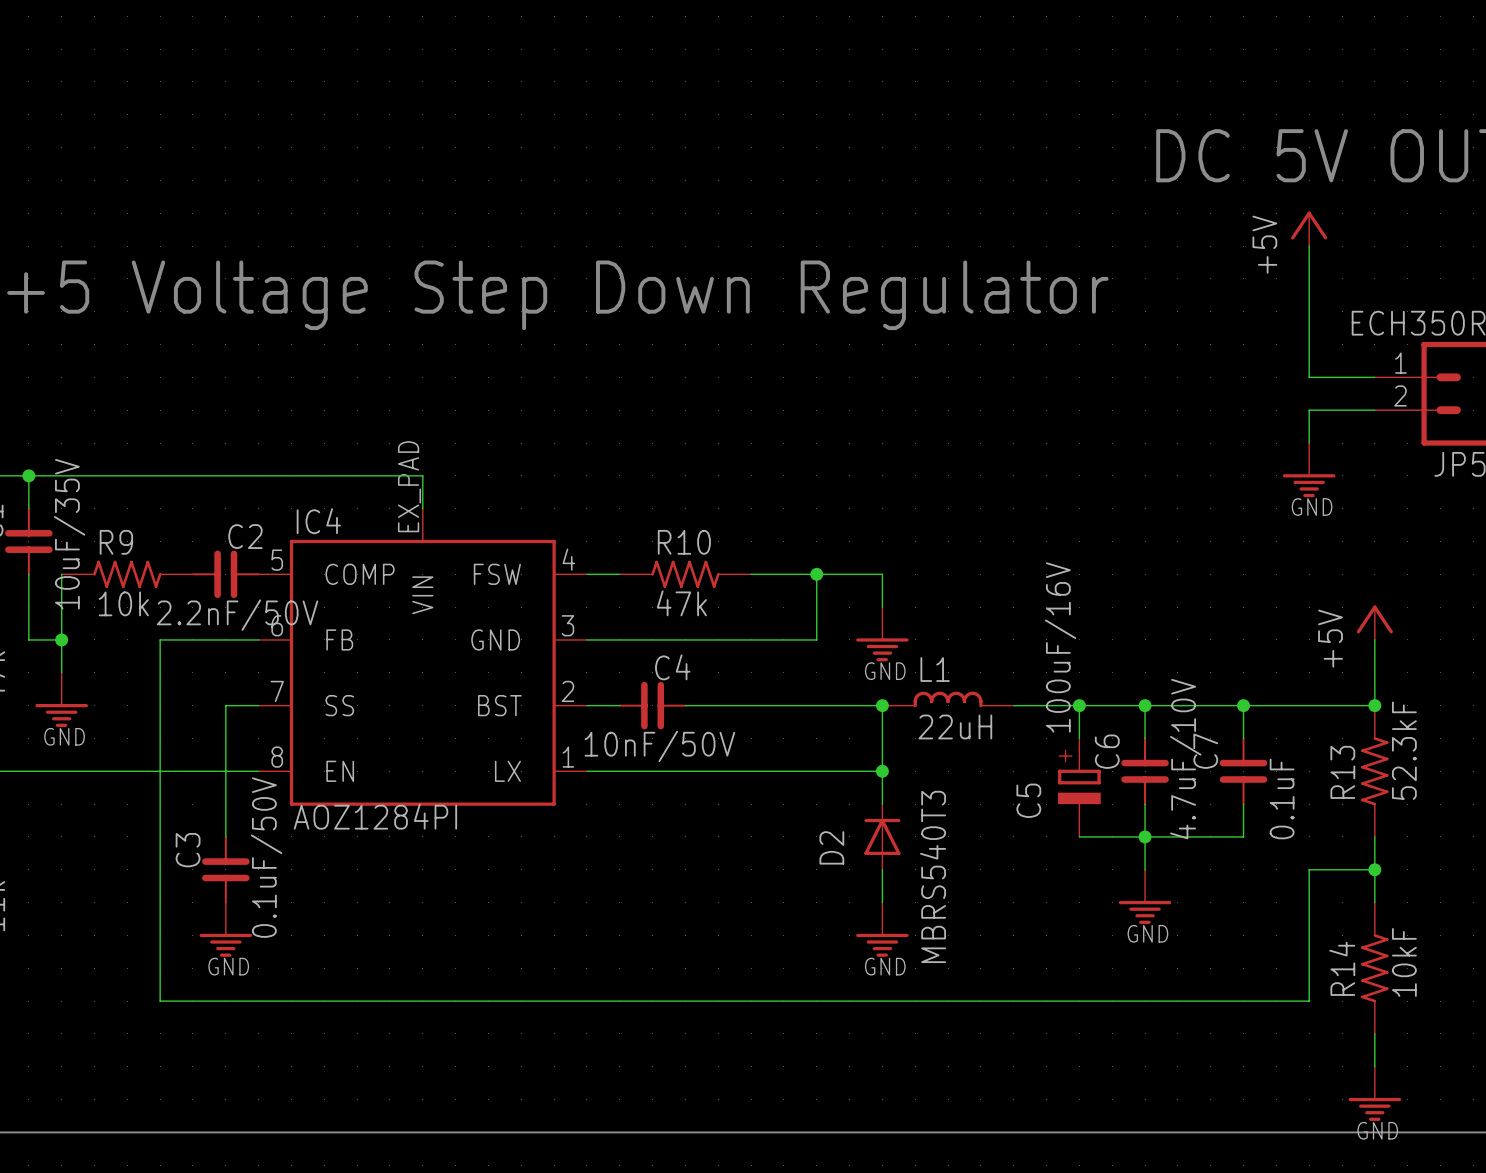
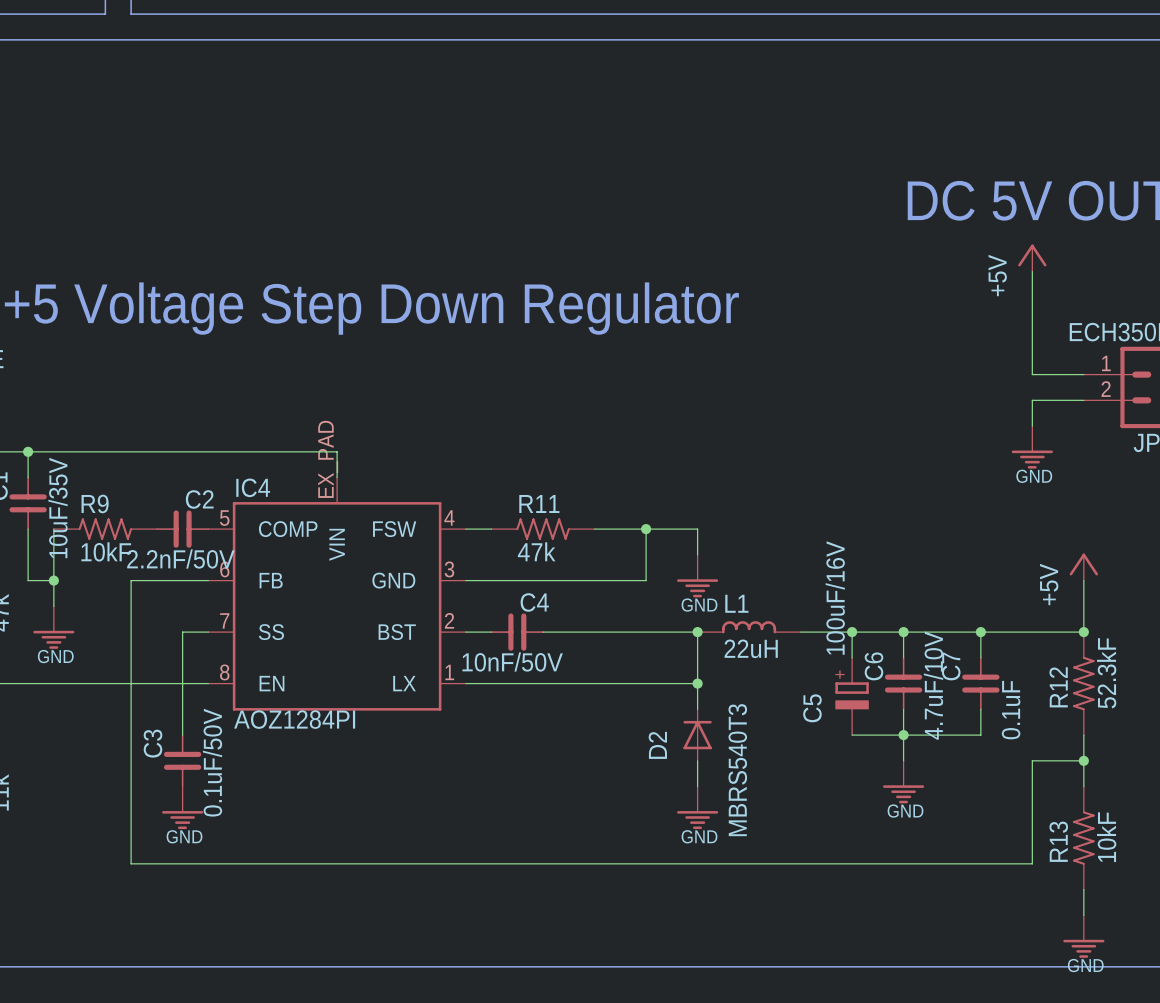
R10 name: R10 (684, 542) -> R11 (539, 503)
R9 value: 10k (123, 603) -> 10kF (106, 551)
R13 name: R13 (1342, 772) -> R12 (1058, 687)
R14 name: R14 (1342, 968) -> R13 (1058, 841)

